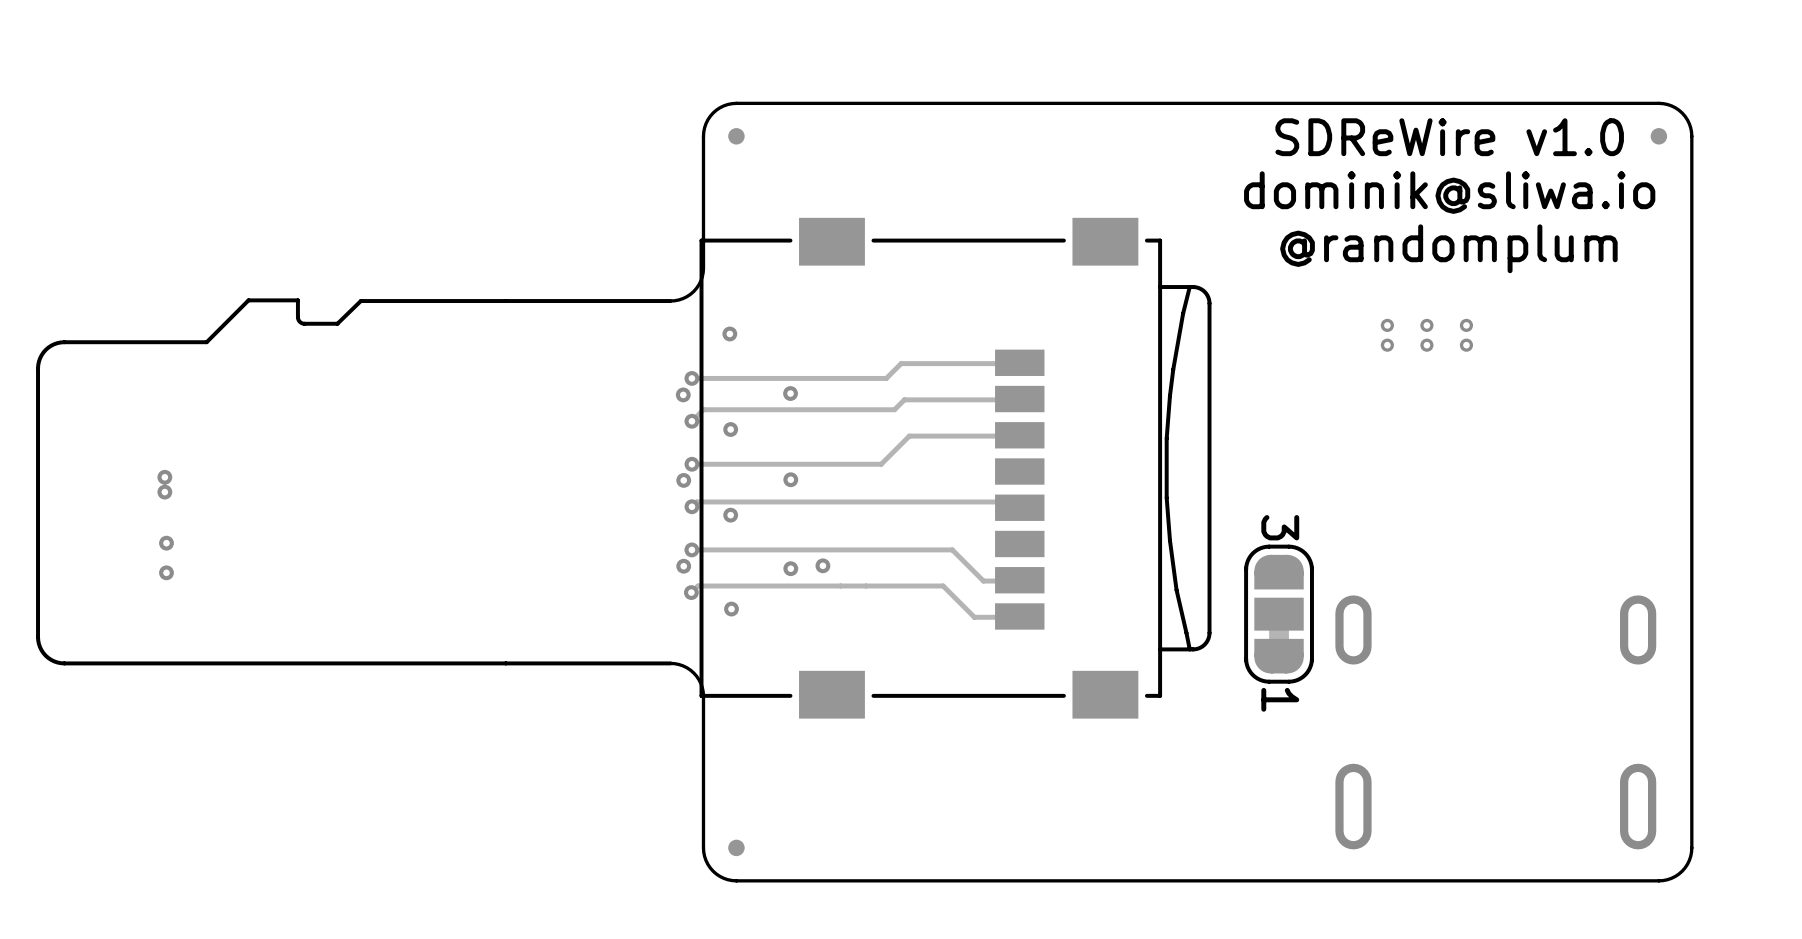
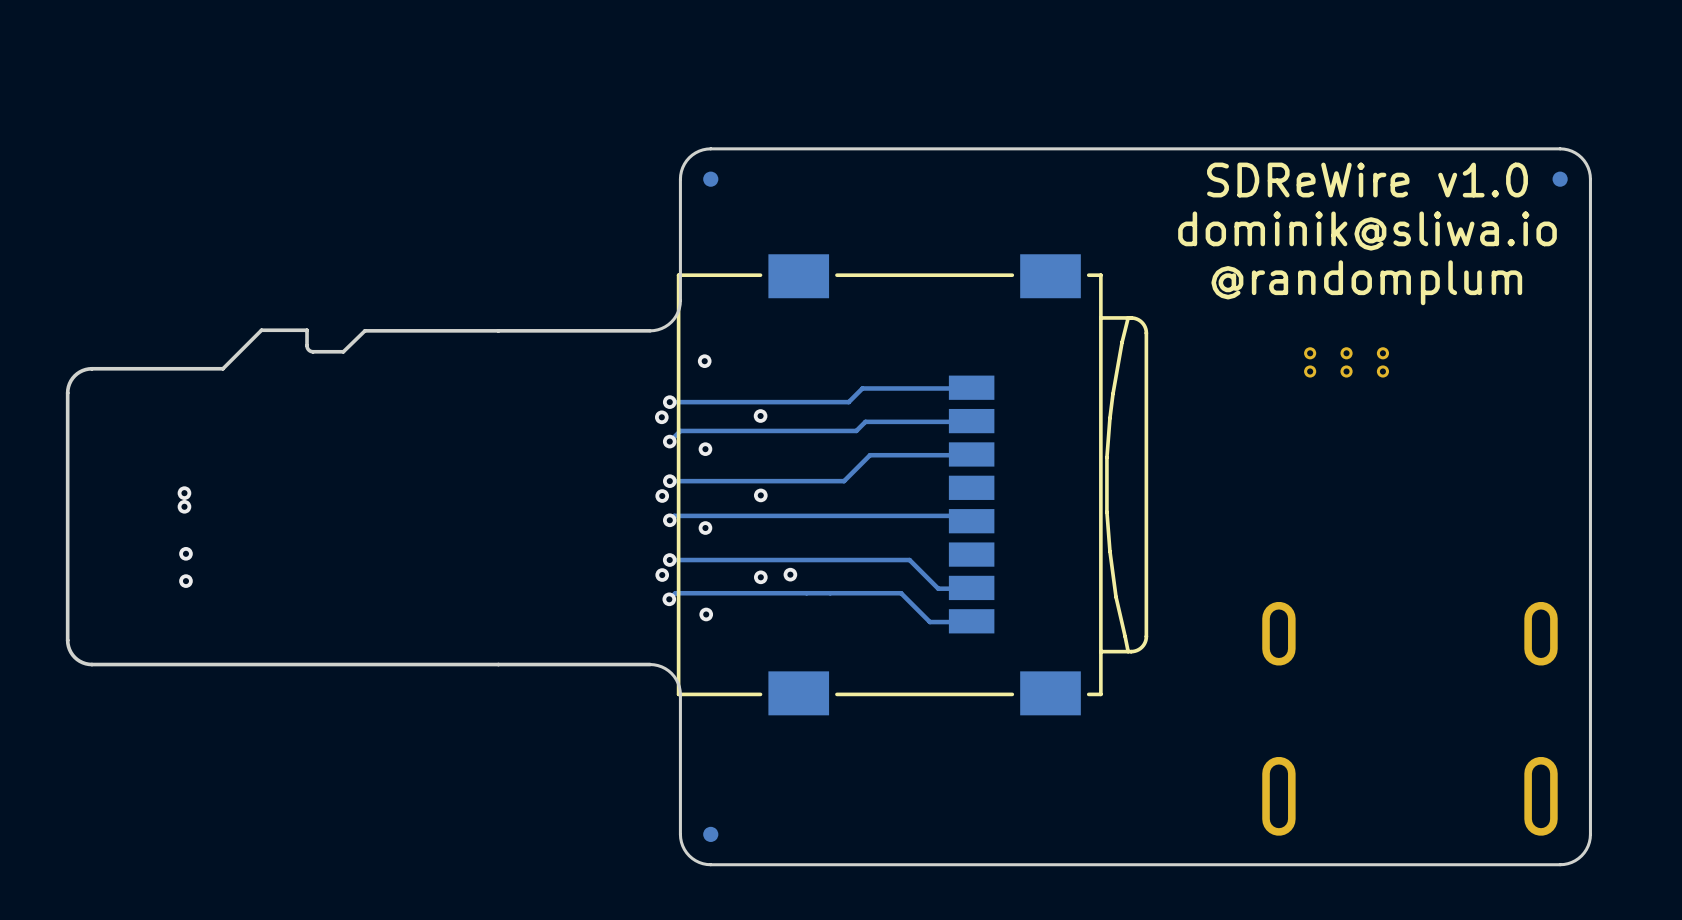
part: (1279, 614) -> none

